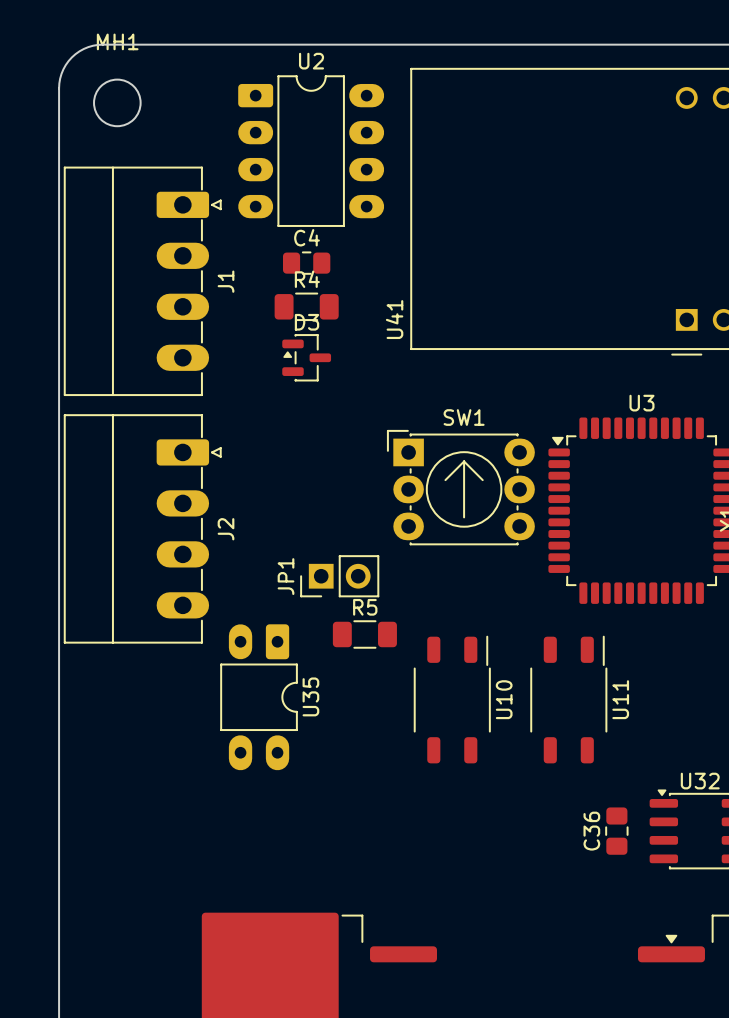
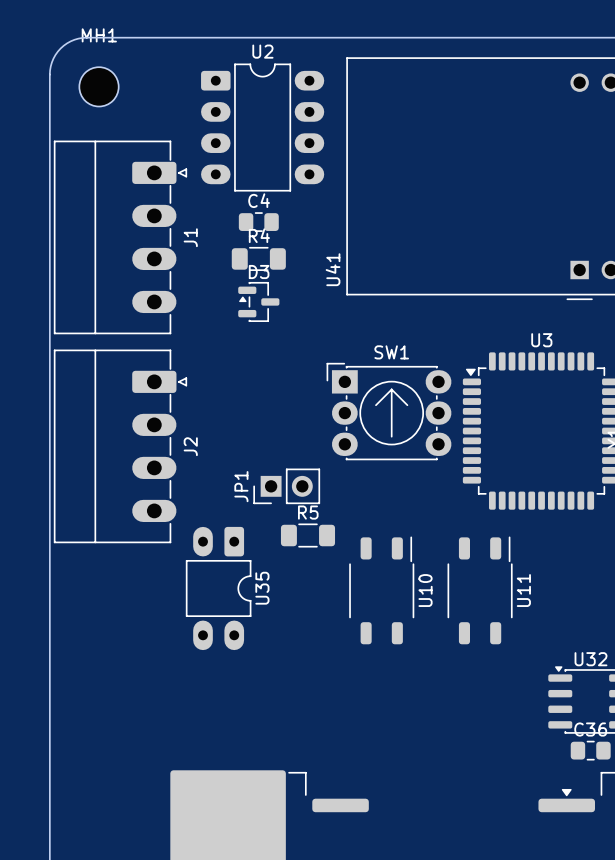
C36 rotation: 0° (616, 831) -> 90° clockwise (590, 750)
C36 position: (616, 831) -> (590, 750)

